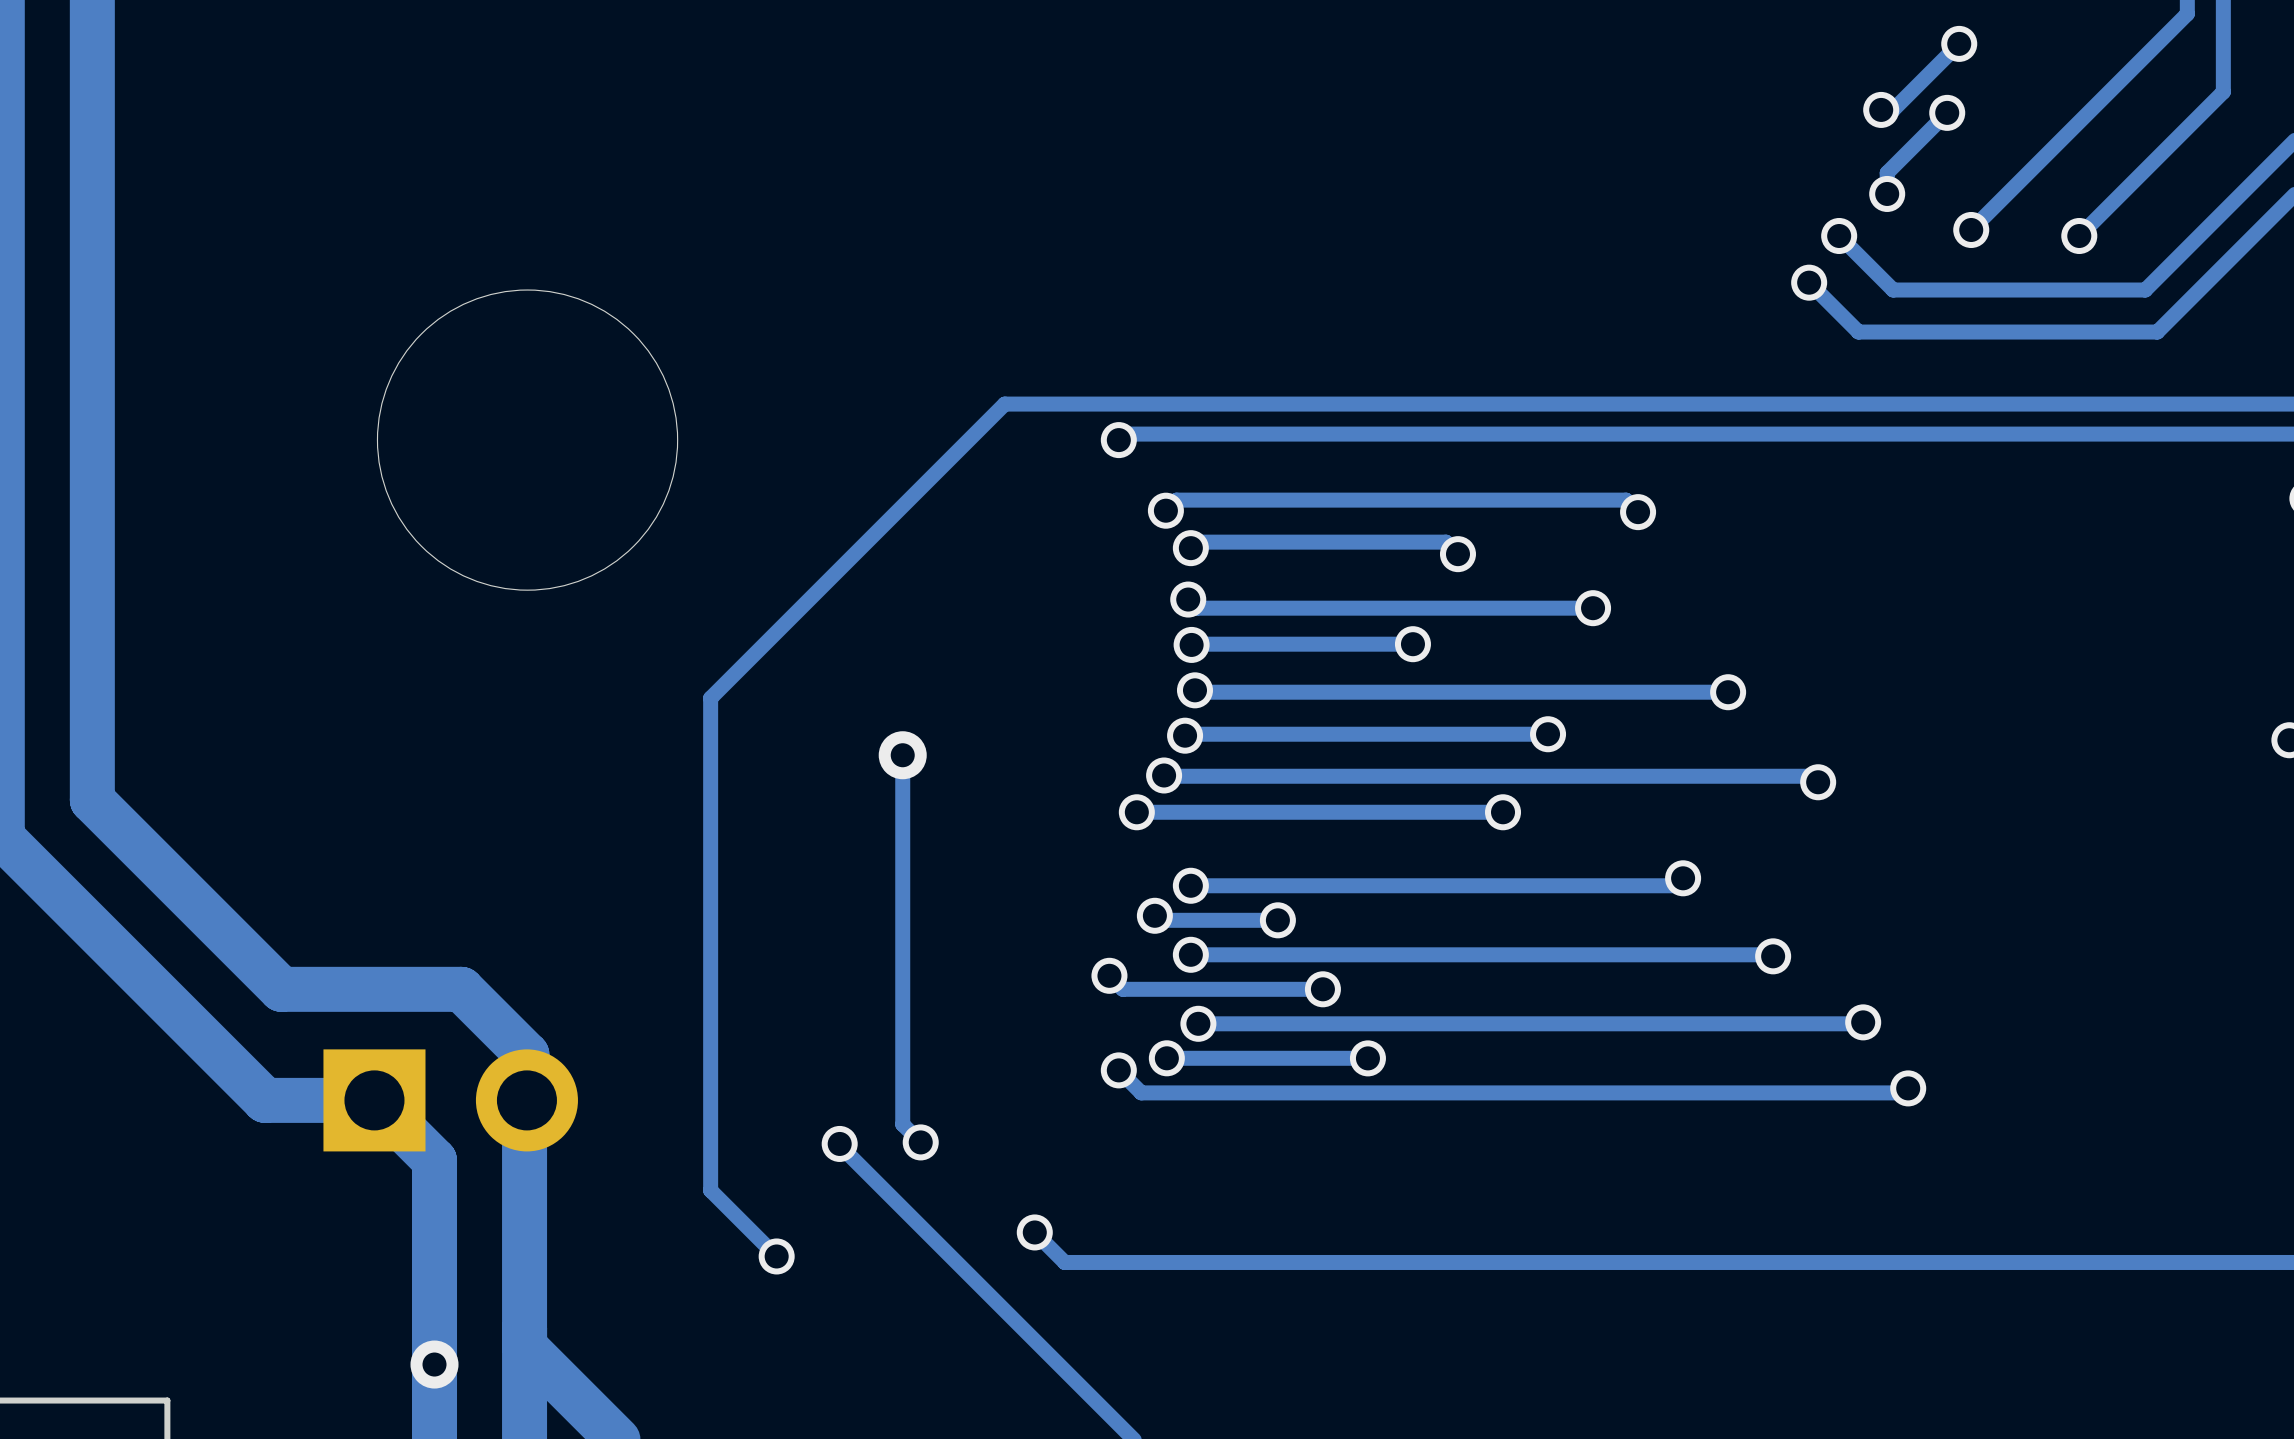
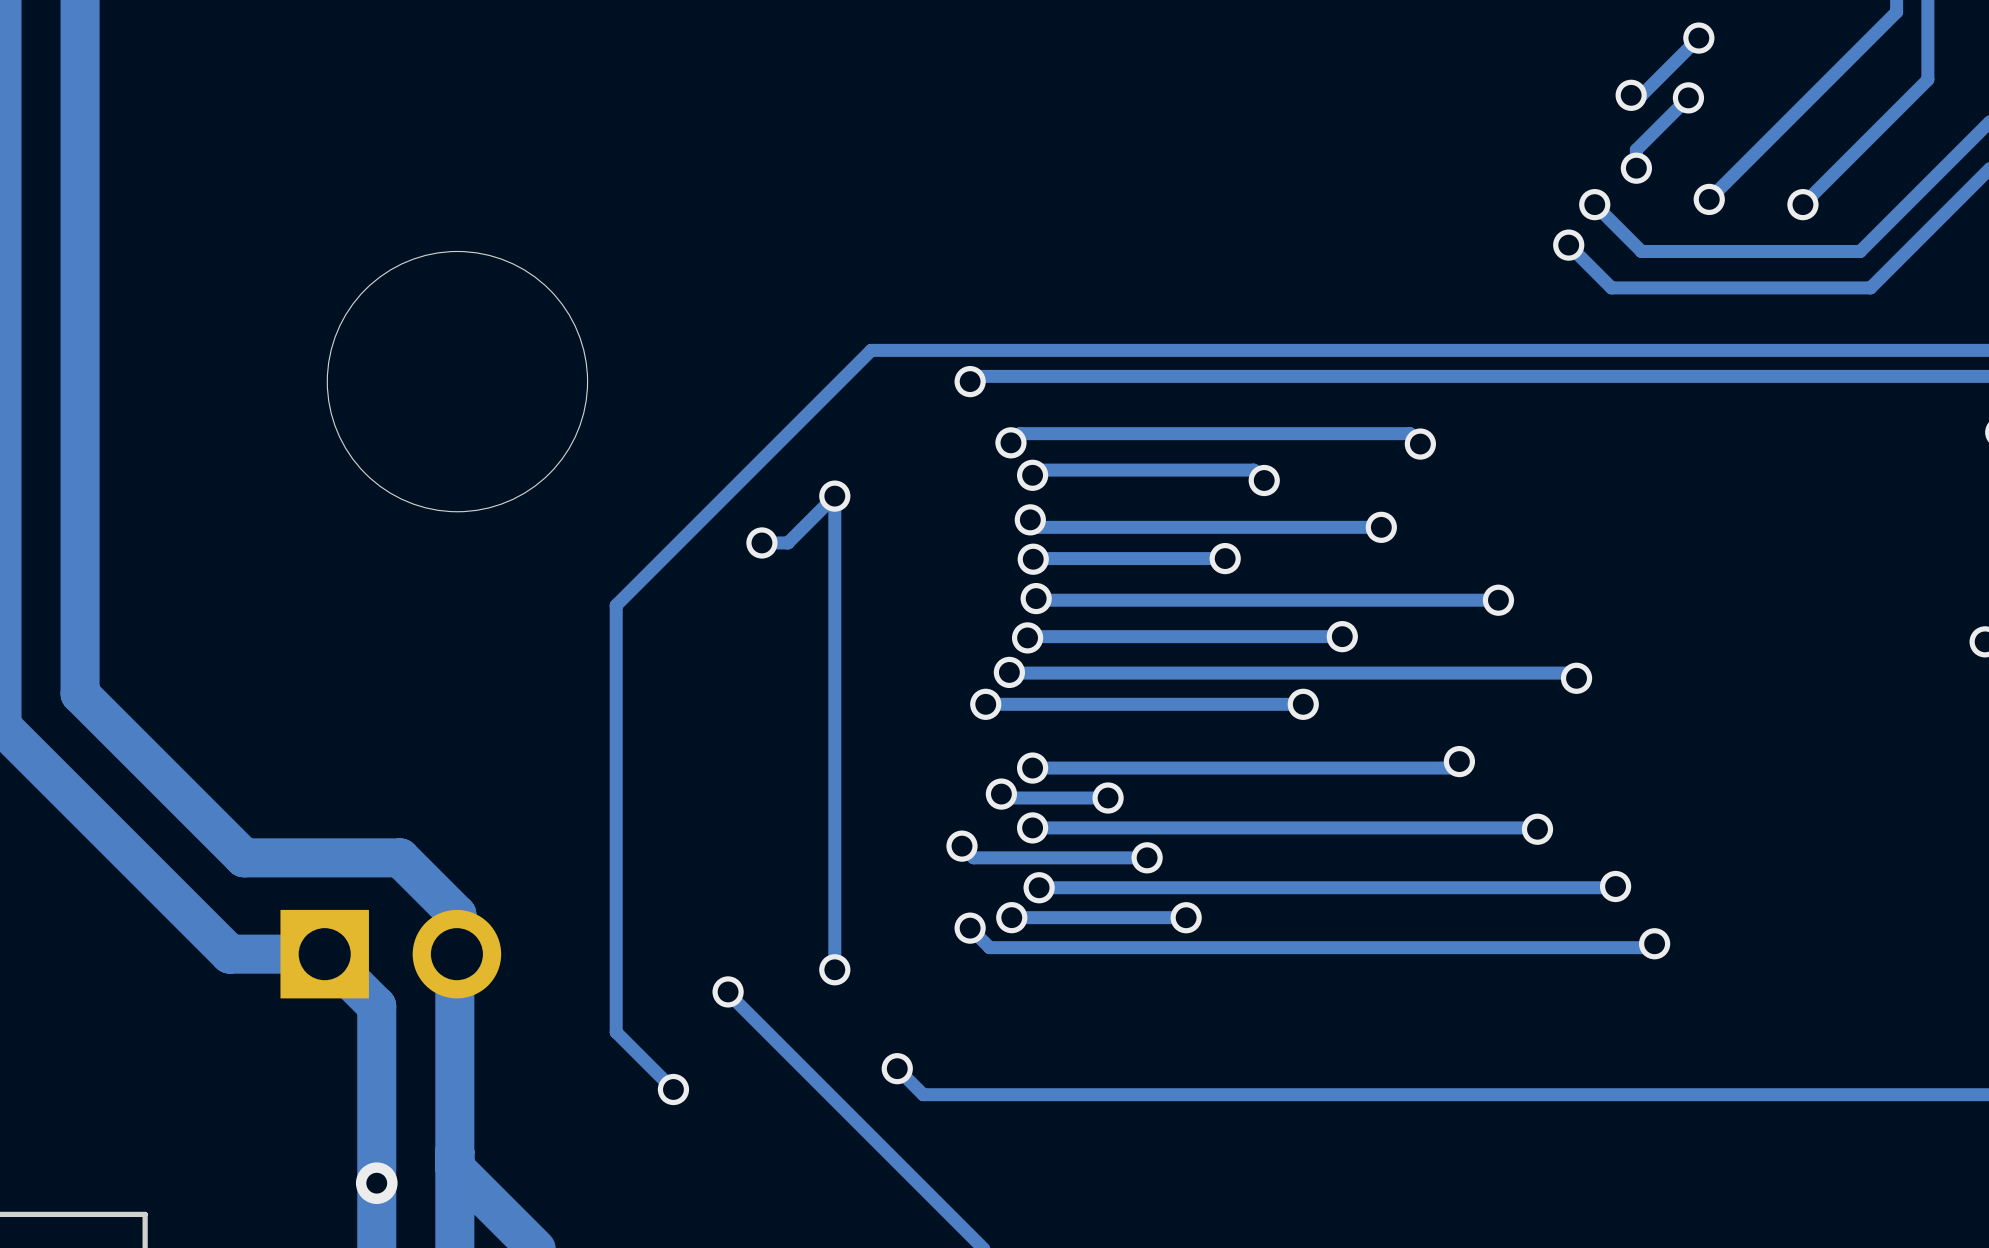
via: none -> (834, 496)
track: none -> (761, 542) (787, 542) (834, 496) (834, 969)
via: none -> (761, 542)
track: (902, 755) (902, 1124) (920, 1142) -> none
via: (902, 755) -> none
via position: (920, 1142) -> (834, 969)

